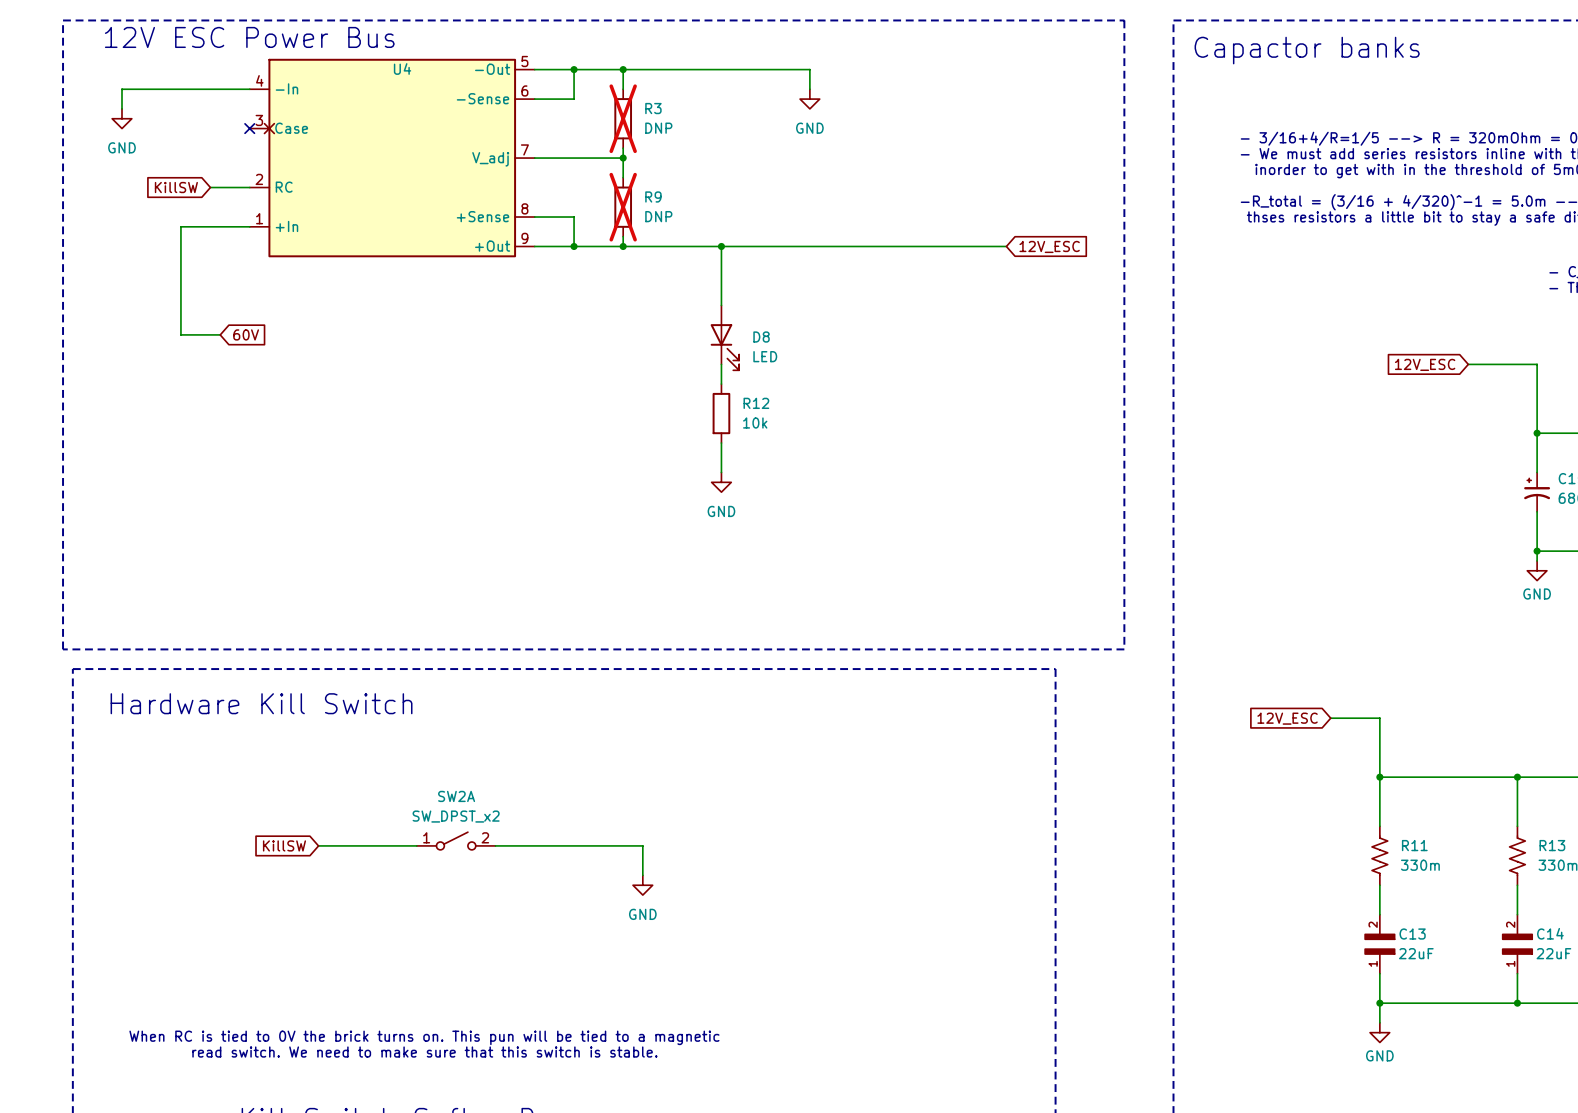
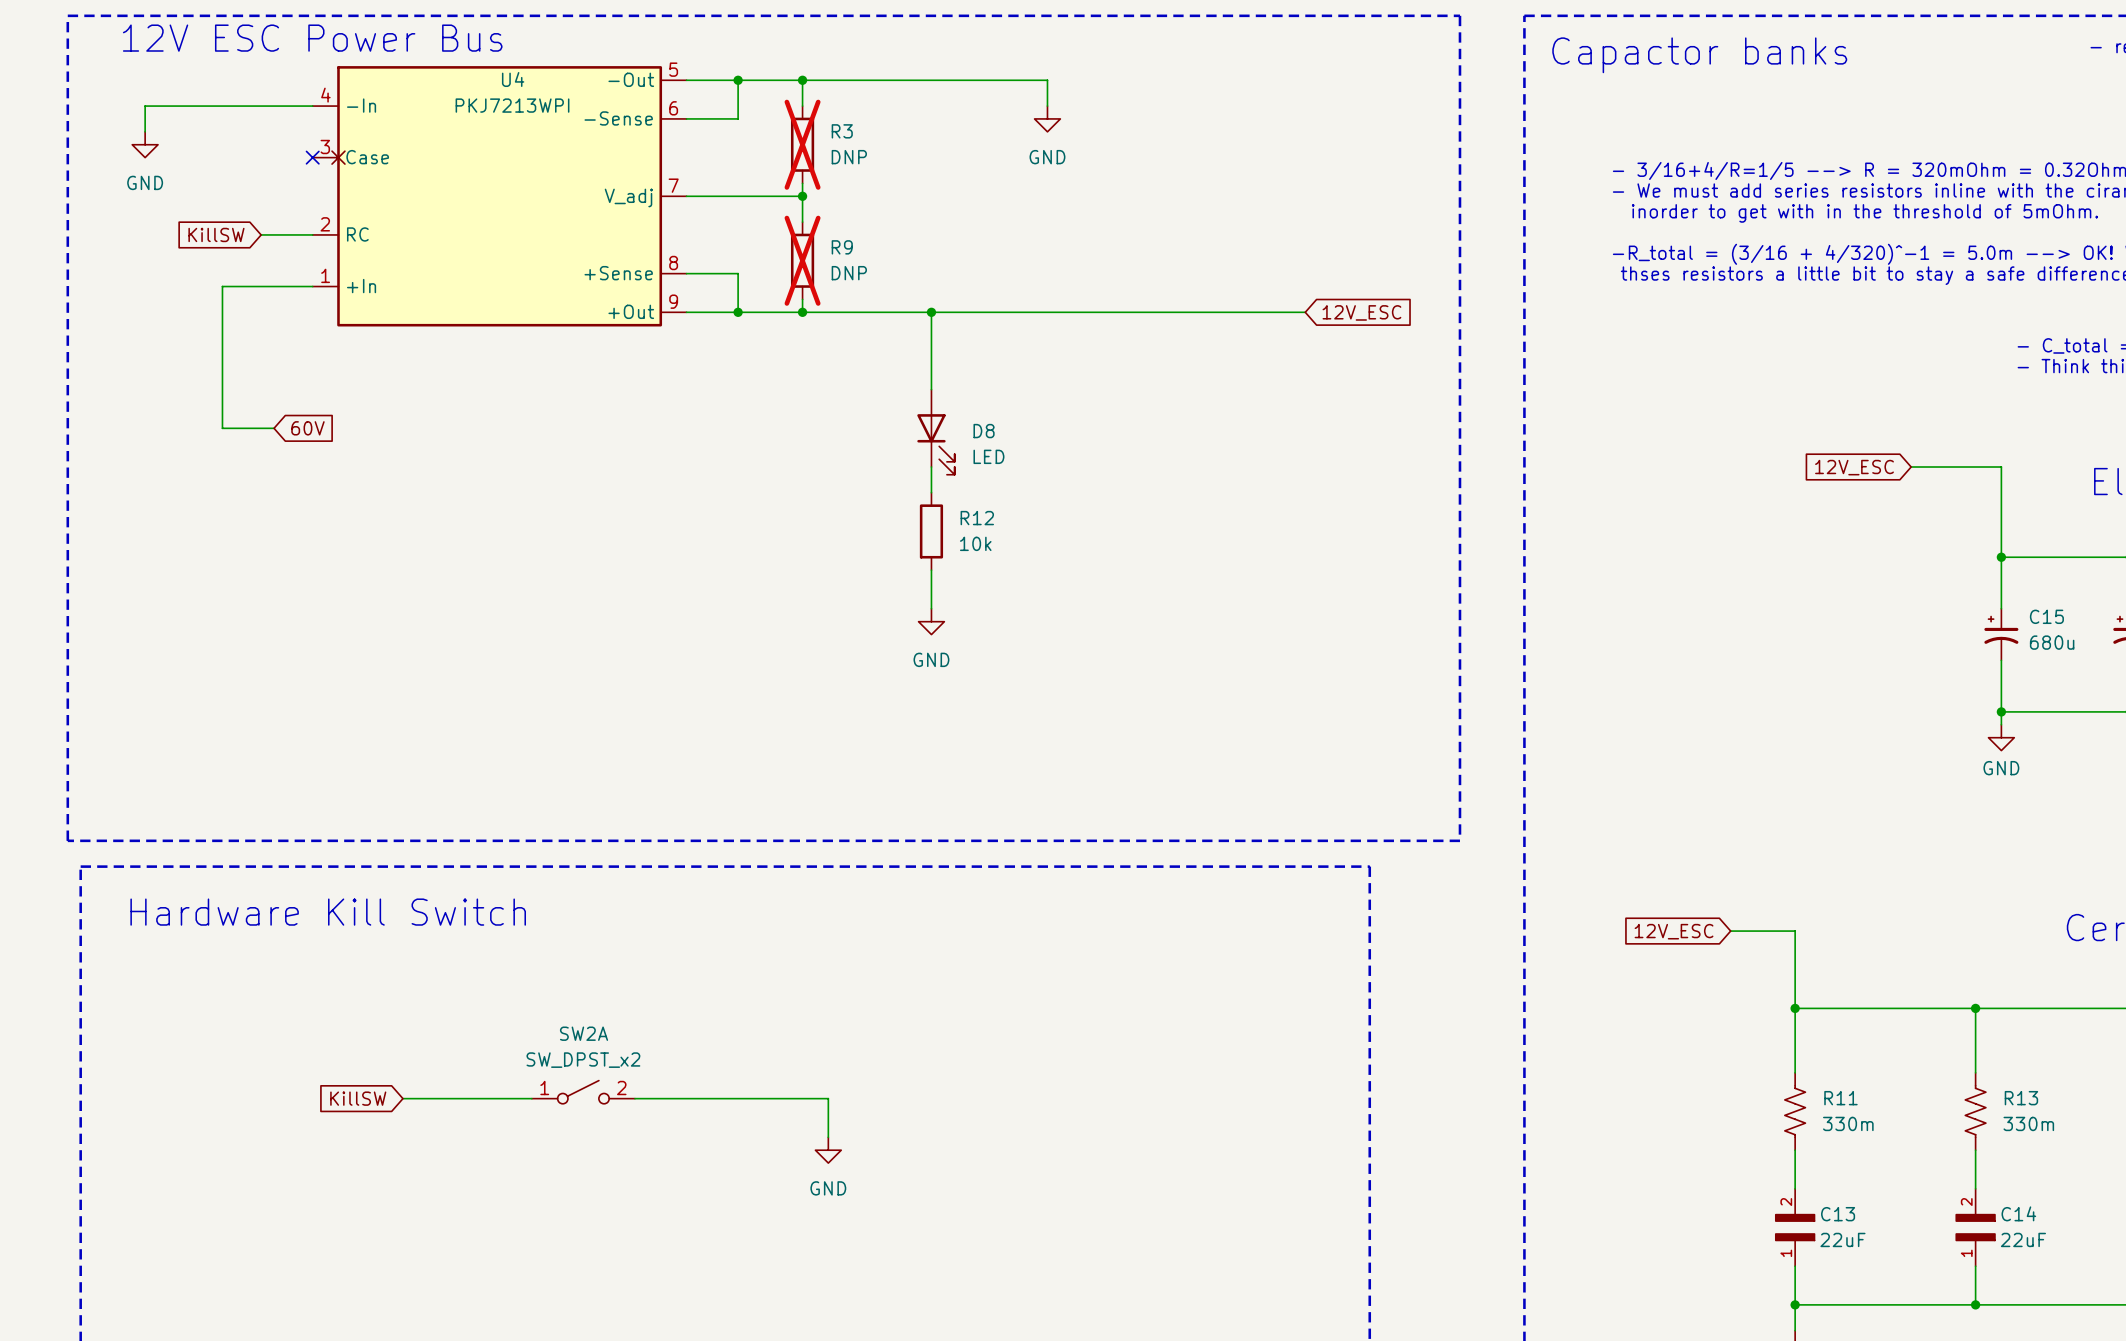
U4 value: none -> PKJ7213WPI (512, 105)

